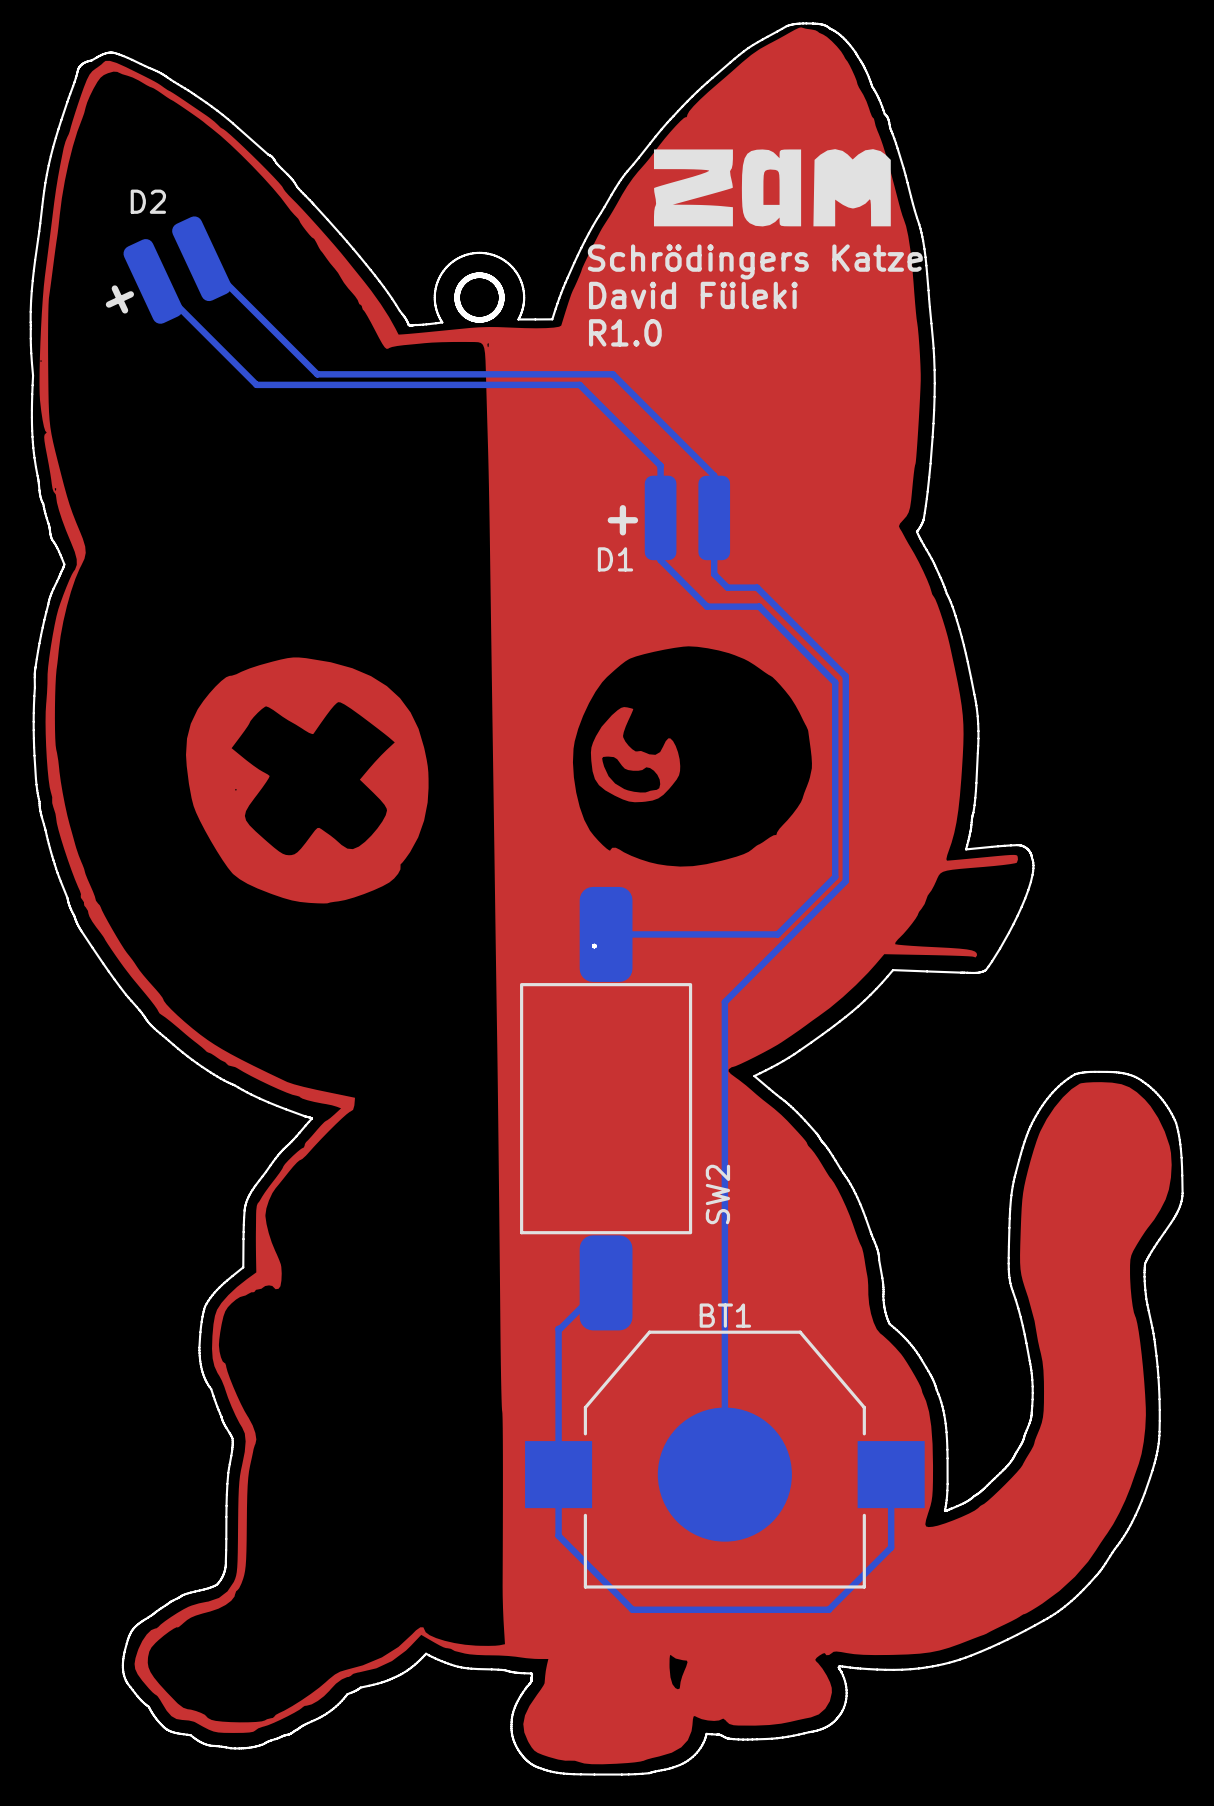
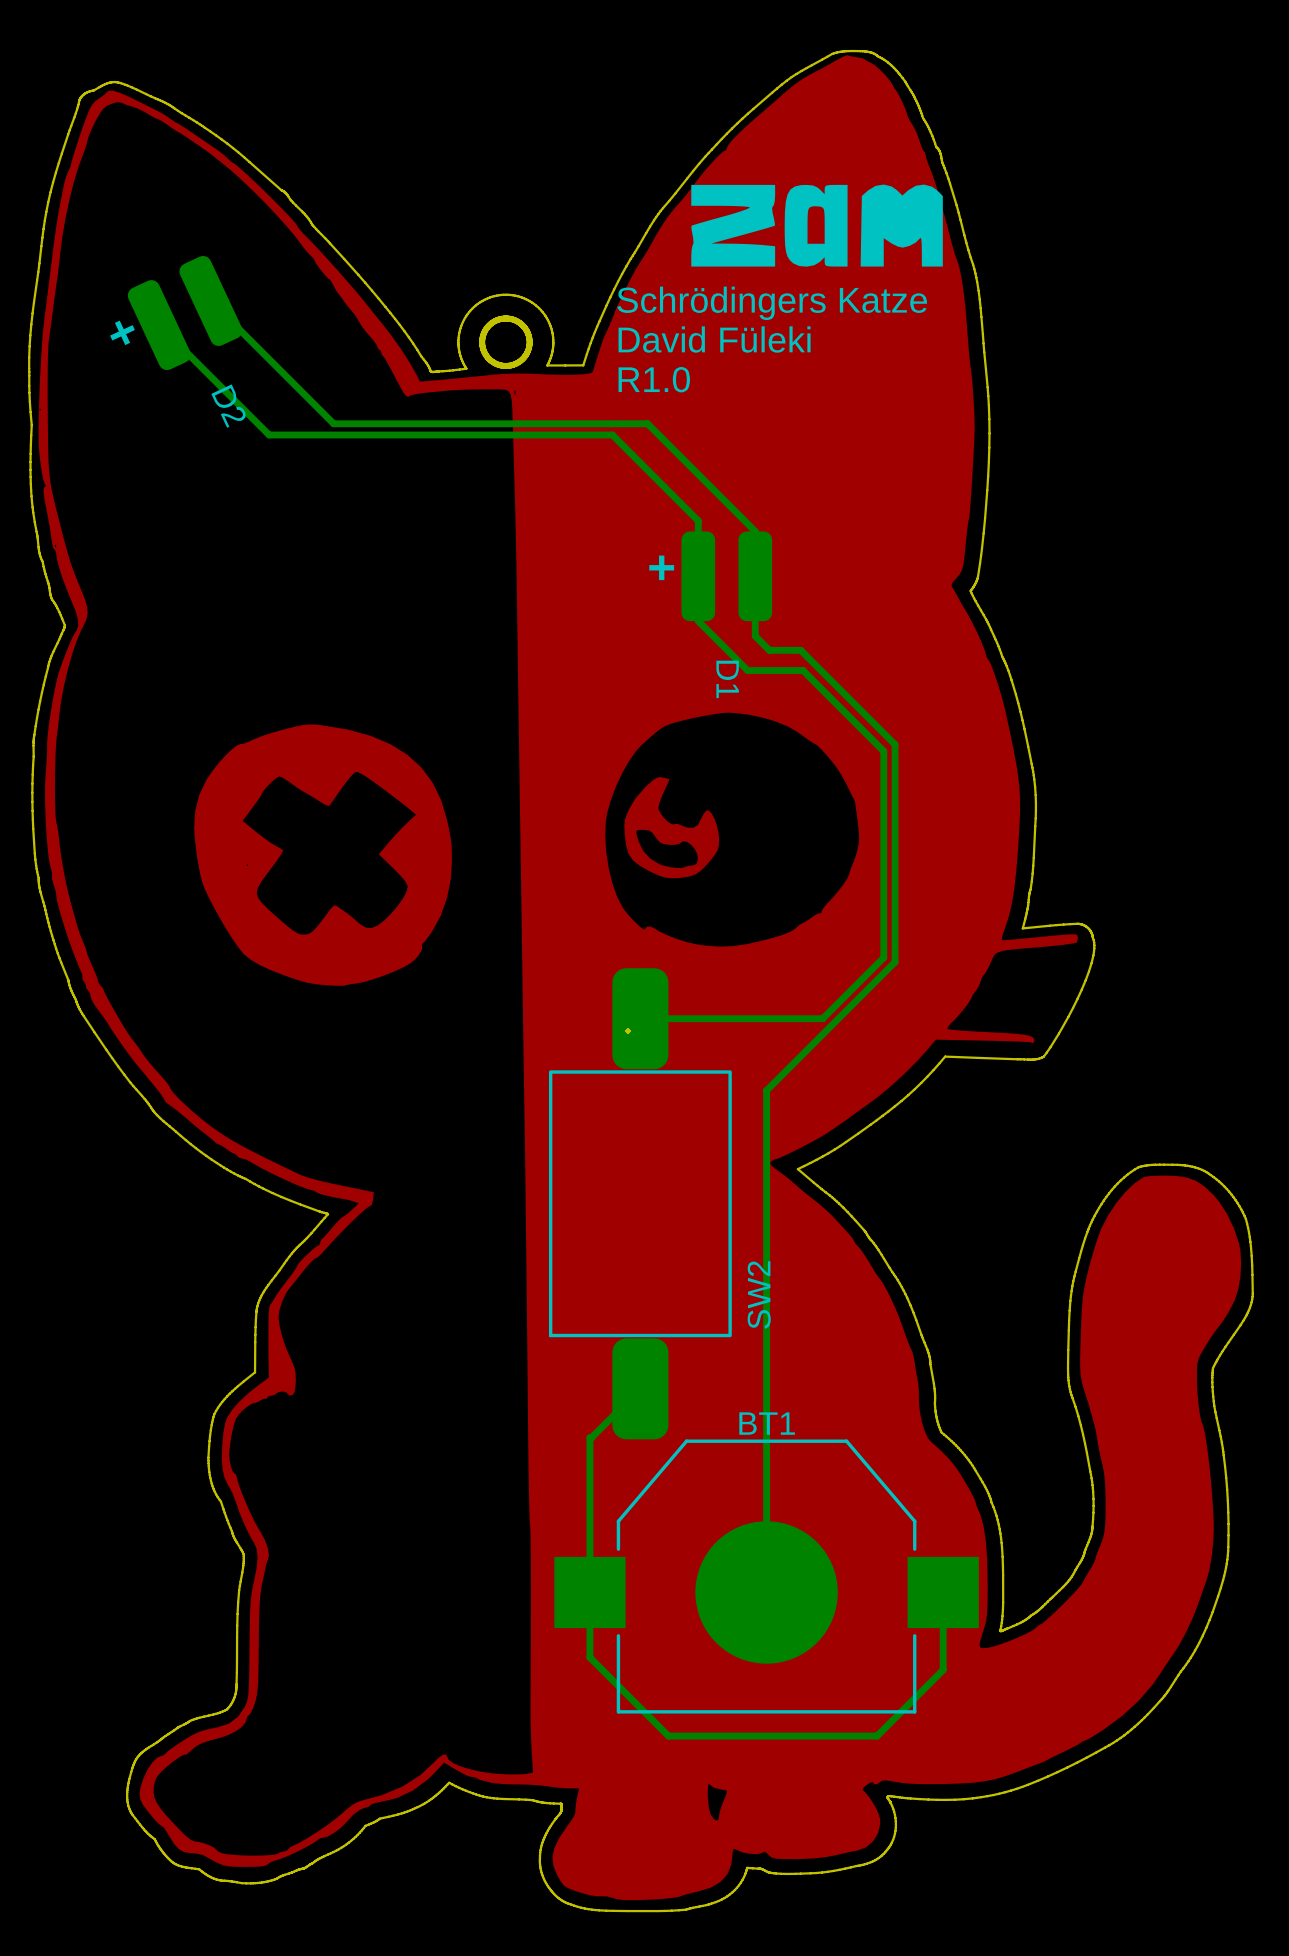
D2 name rotation: 0° (148, 201) -> 65° clockwise (228, 406)
D2 name position: D2 (148, 201) -> D2 (228, 406)
D1 name rotation: 0° (615, 559) -> 90° clockwise (727, 679)
D1 name position: D1 (615, 559) -> D1 (727, 679)

